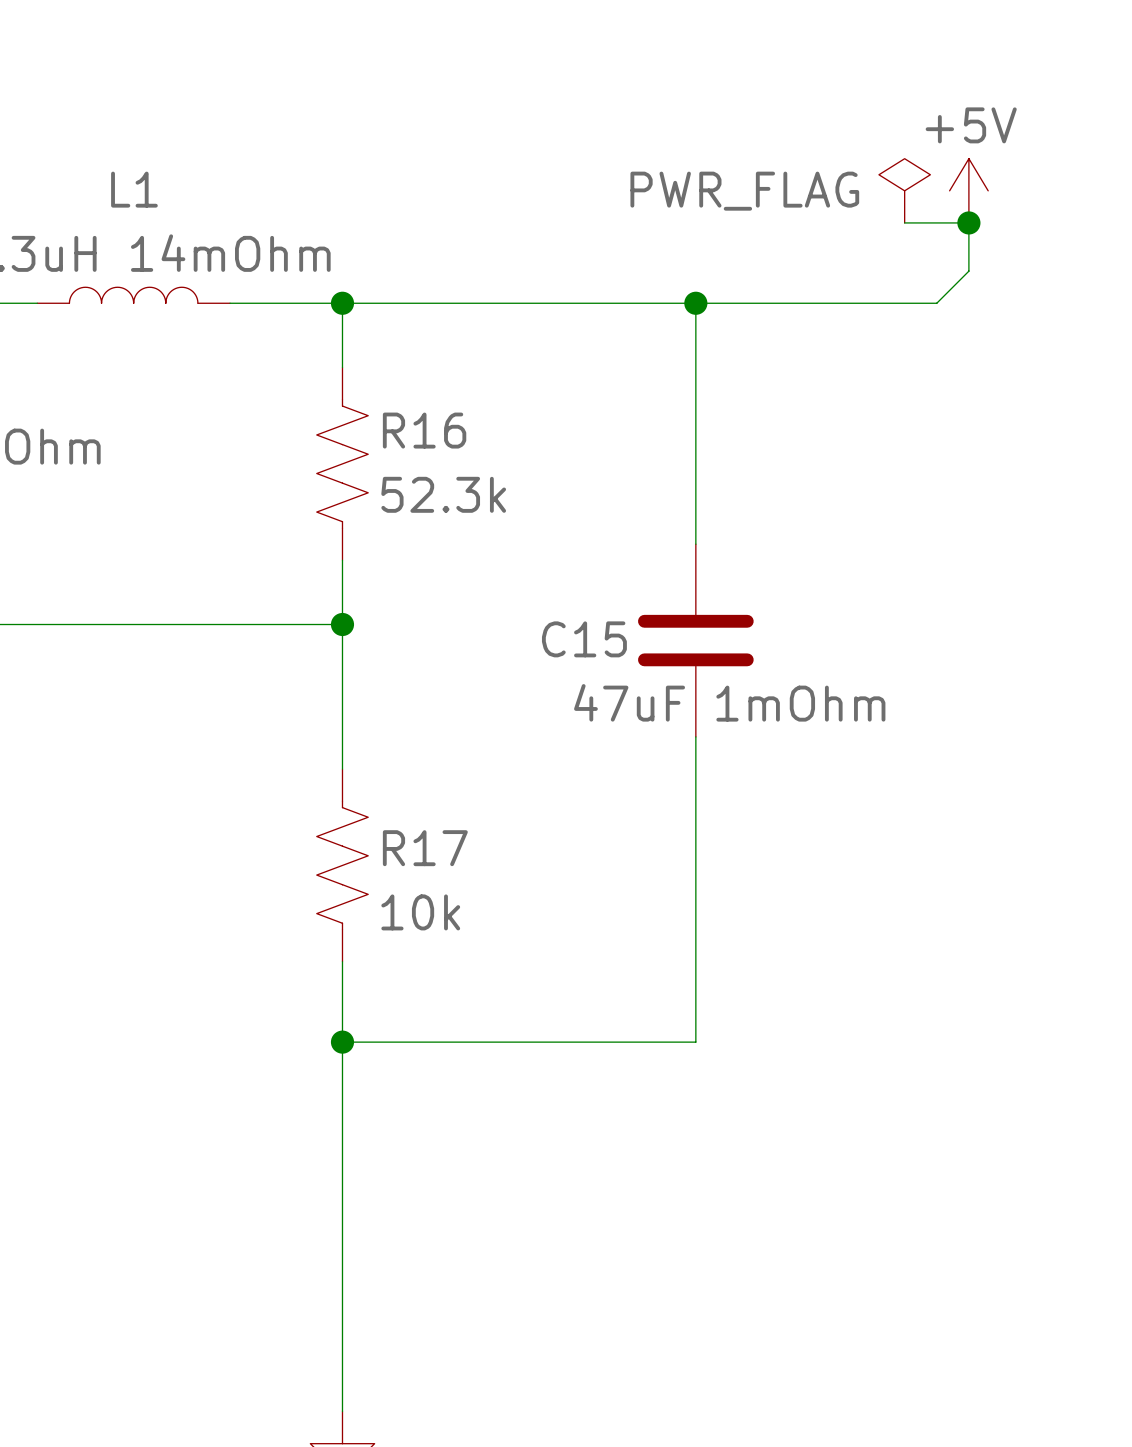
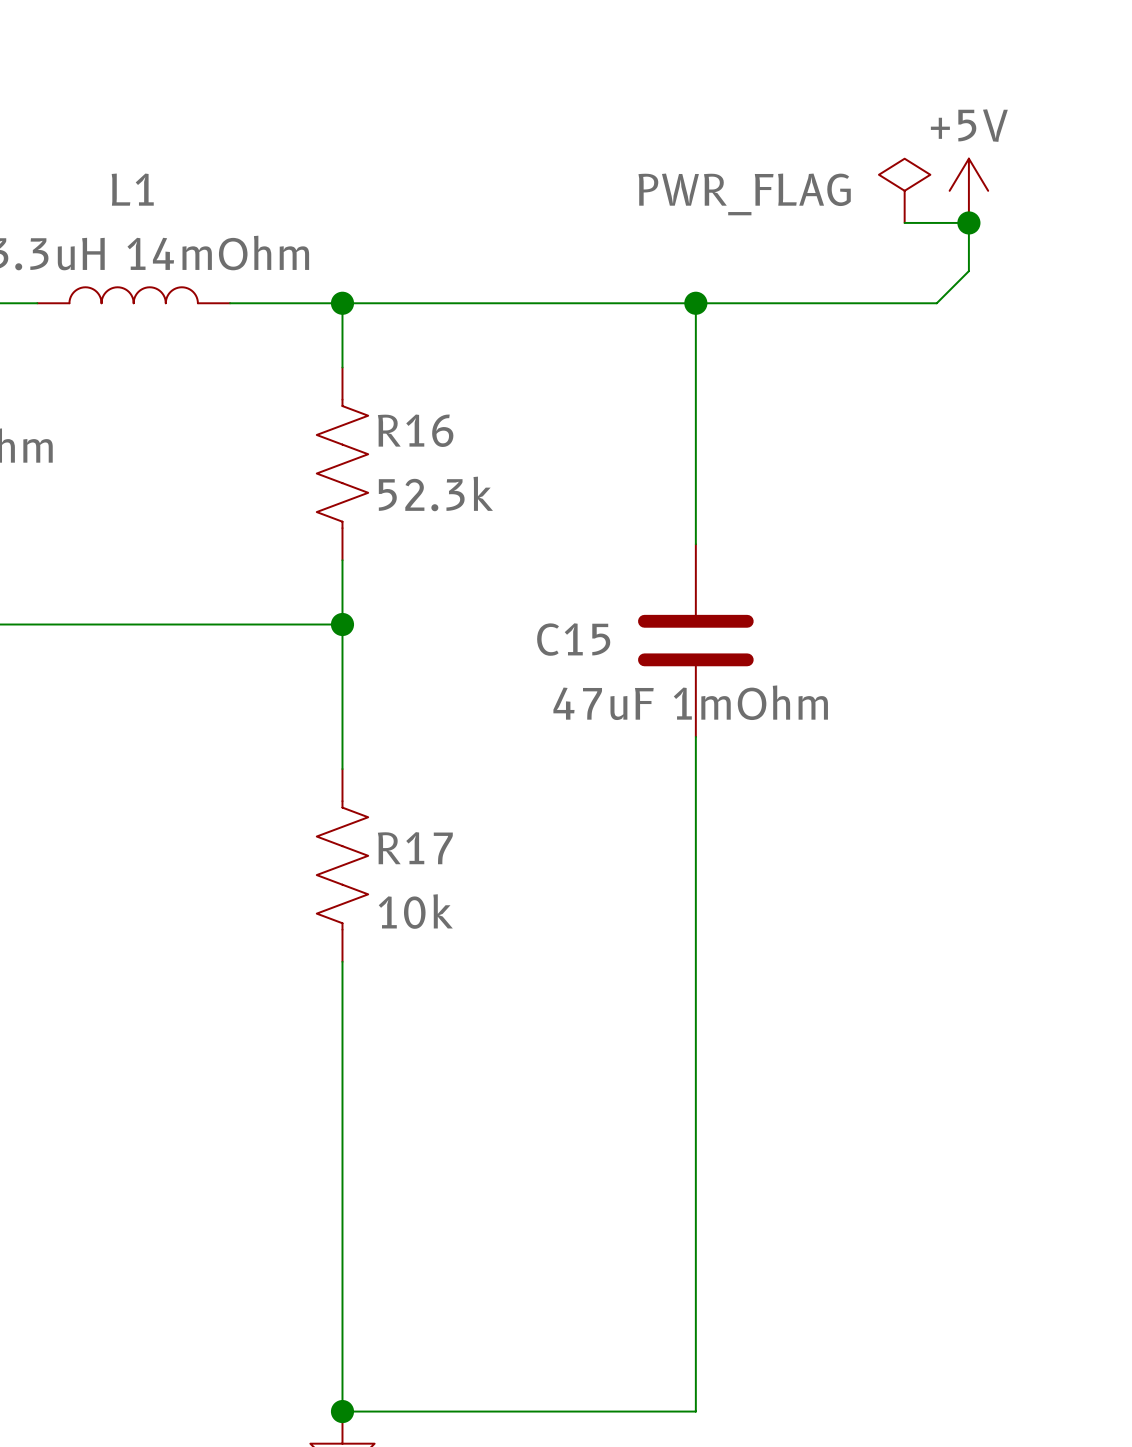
C15 value position: 47uF 1mOhm (729, 702) -> 47uF 1mOhm (690, 702)
wire: (342, 1042) (695, 1042) -> (342, 1411) (695, 1411) (695, 1042)
junction: (342, 1042) -> none
junction: none -> (342, 1411)

